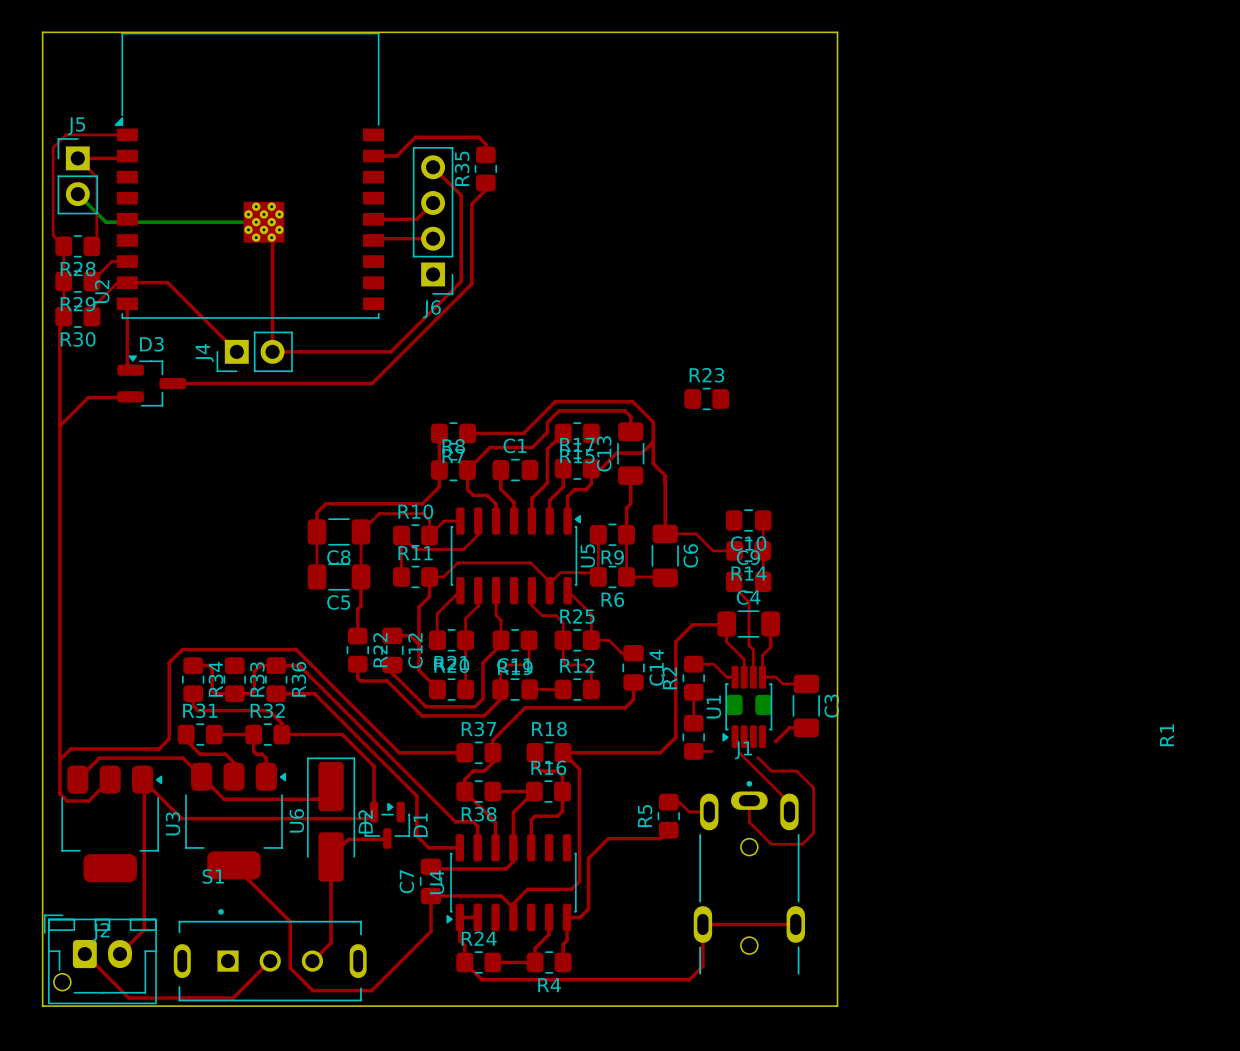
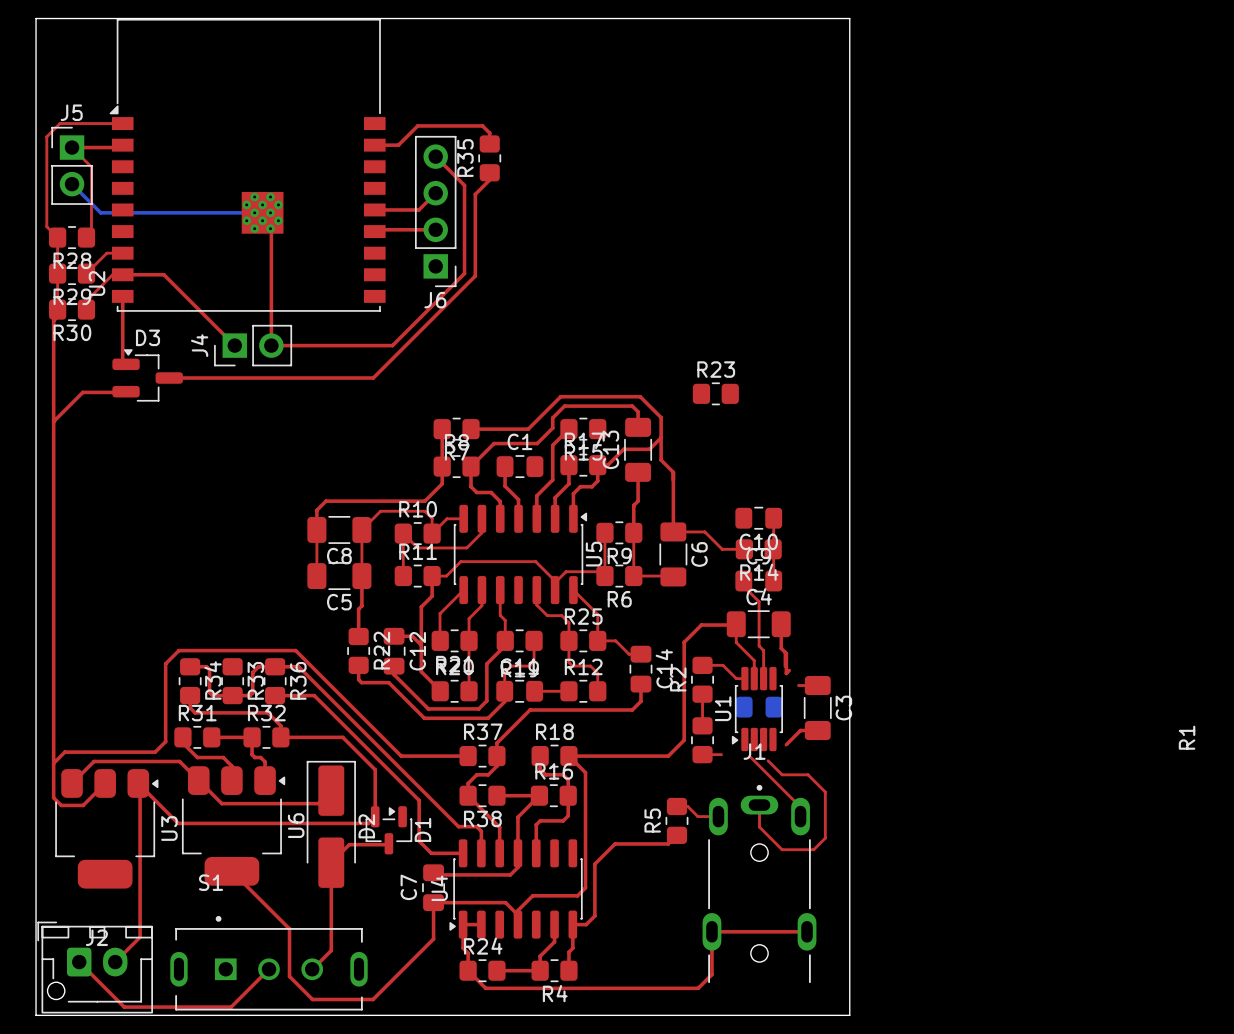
top track: (770, 647) (762, 655) (762, 677) (776, 677) (782, 683) (787, 683) -> (781, 648) (786, 653) (786, 673) (789, 670)
top track: none -> (785, 652) (785, 666)

